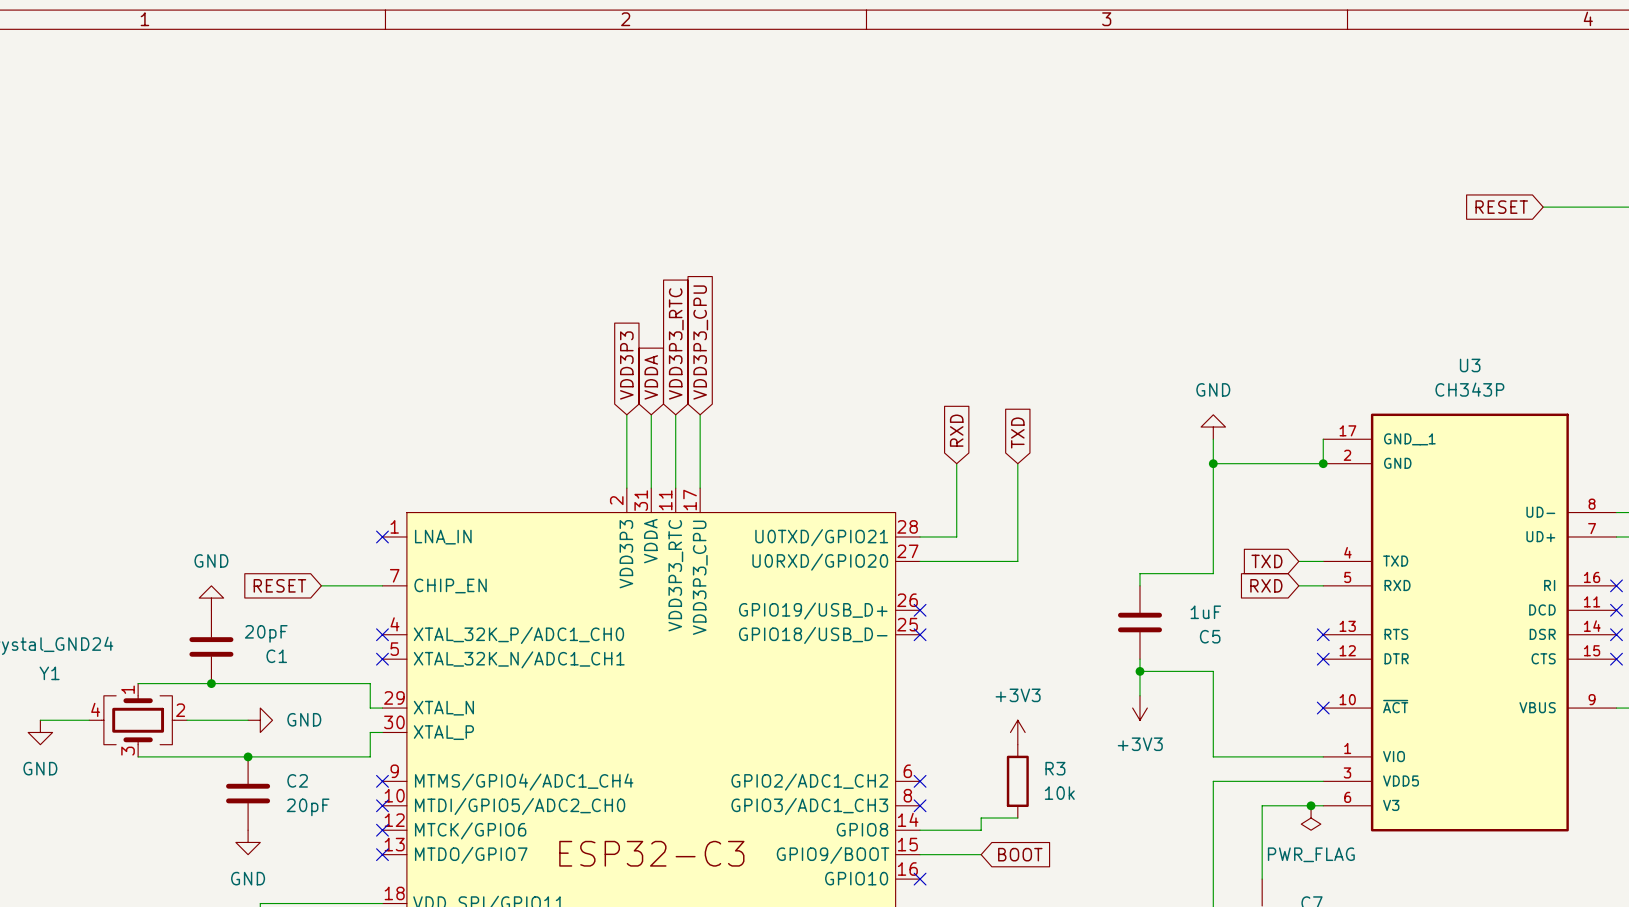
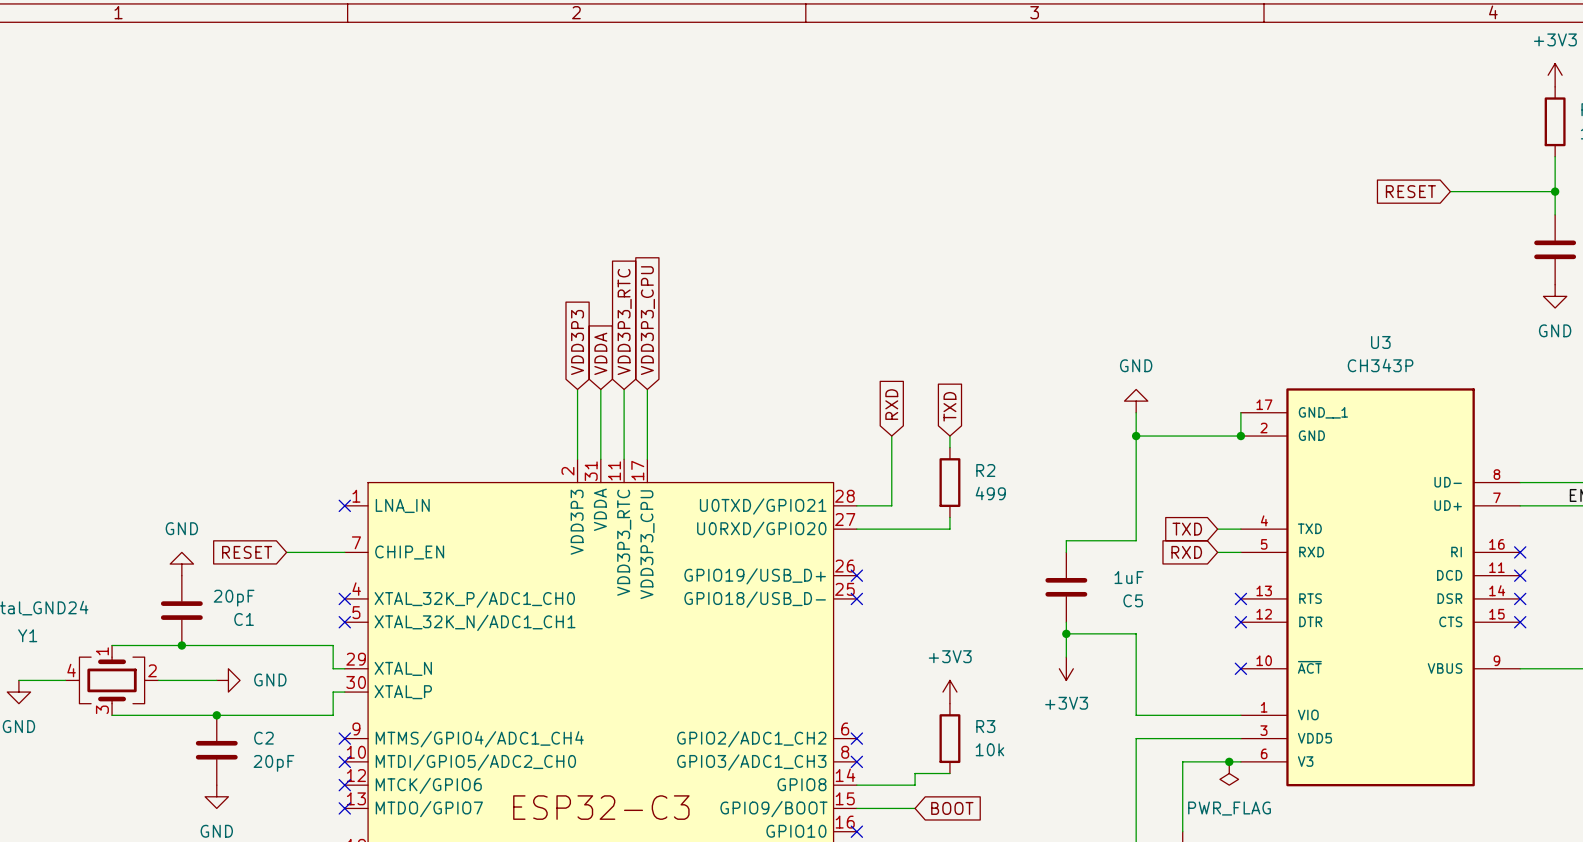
wire: (1017, 475) (1017, 549) -> none
R2: none -> 499 (949, 482)

